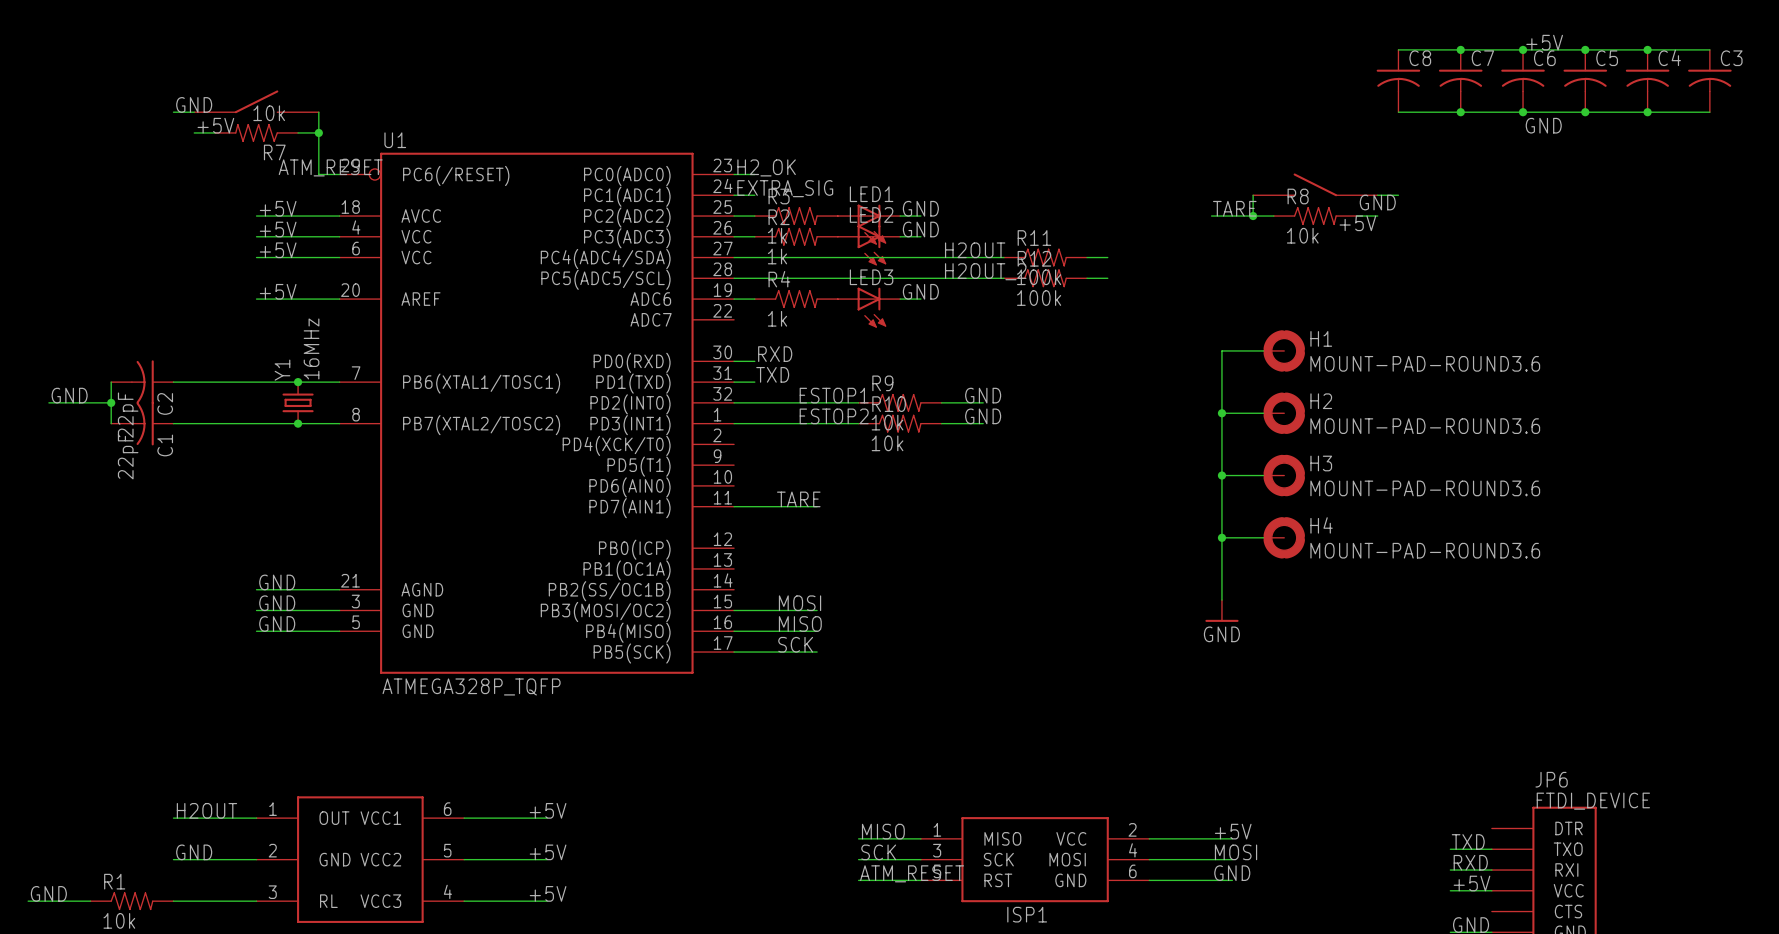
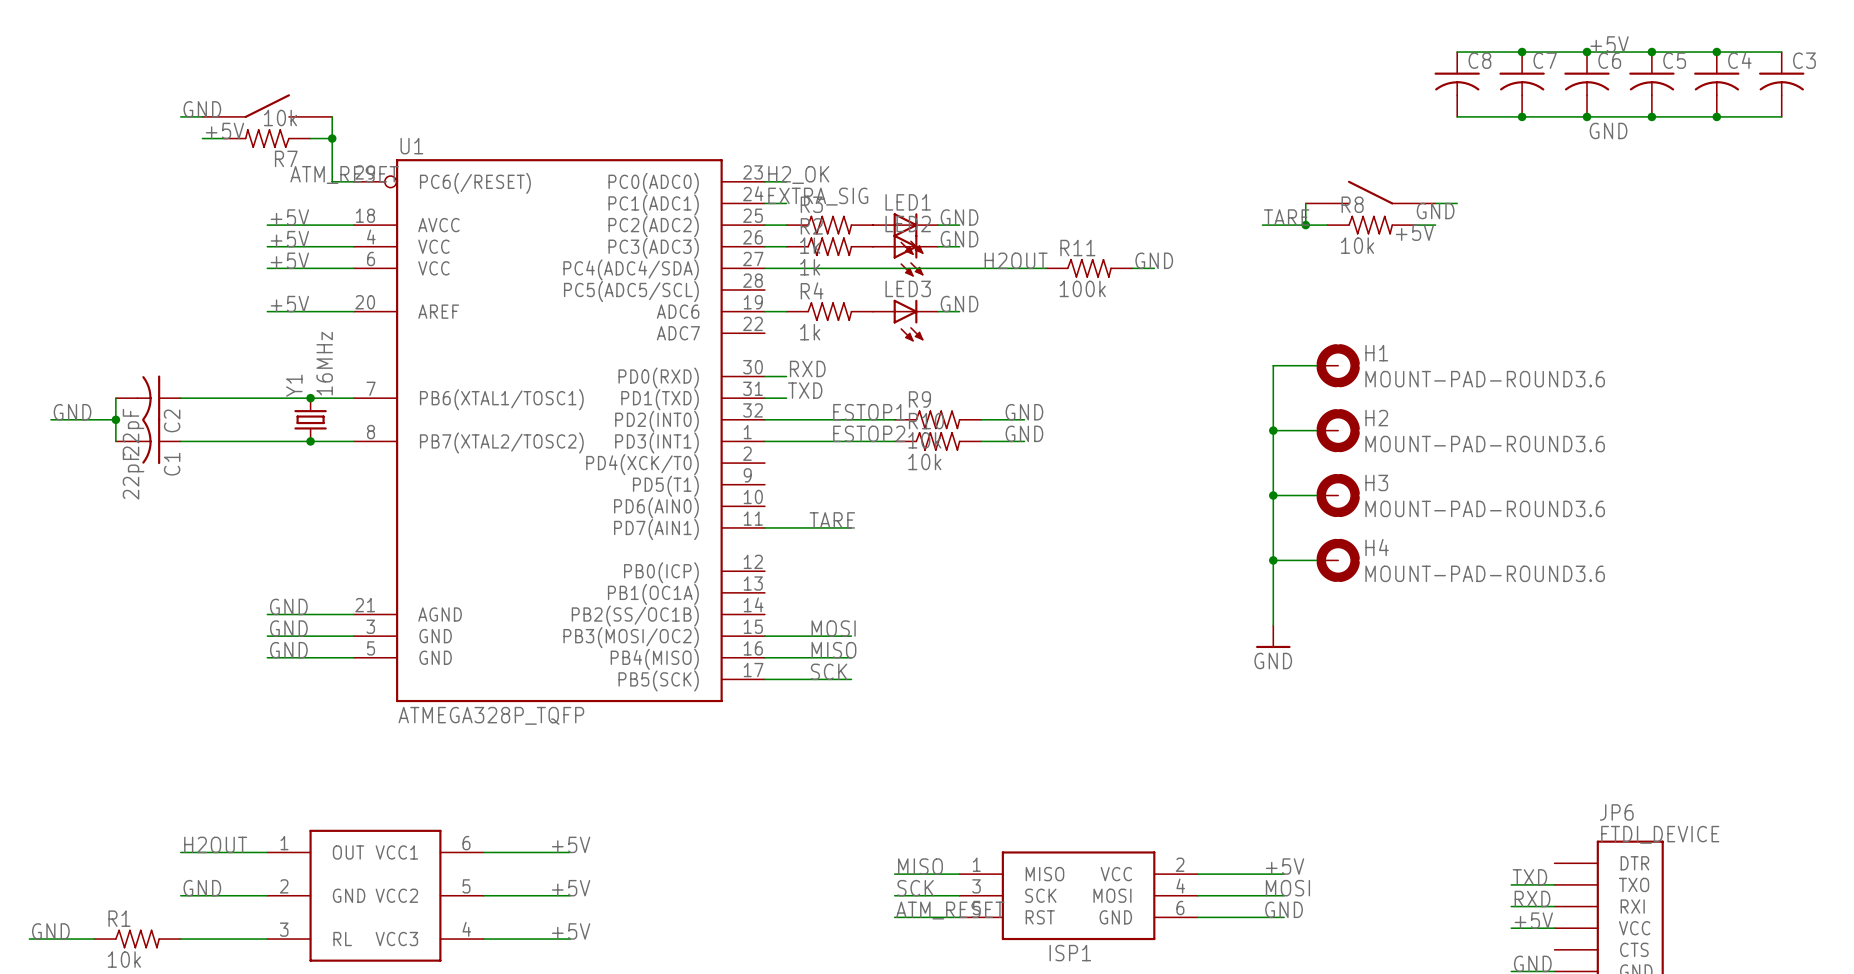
label: none -> GND (1154, 260)
label: H2OUT_2 (985, 271) -> none
wire: (734, 278) (1003, 278) -> none
R12: 100k (1045, 278) -> none
wire: (1087, 278) (1107, 278) -> none

